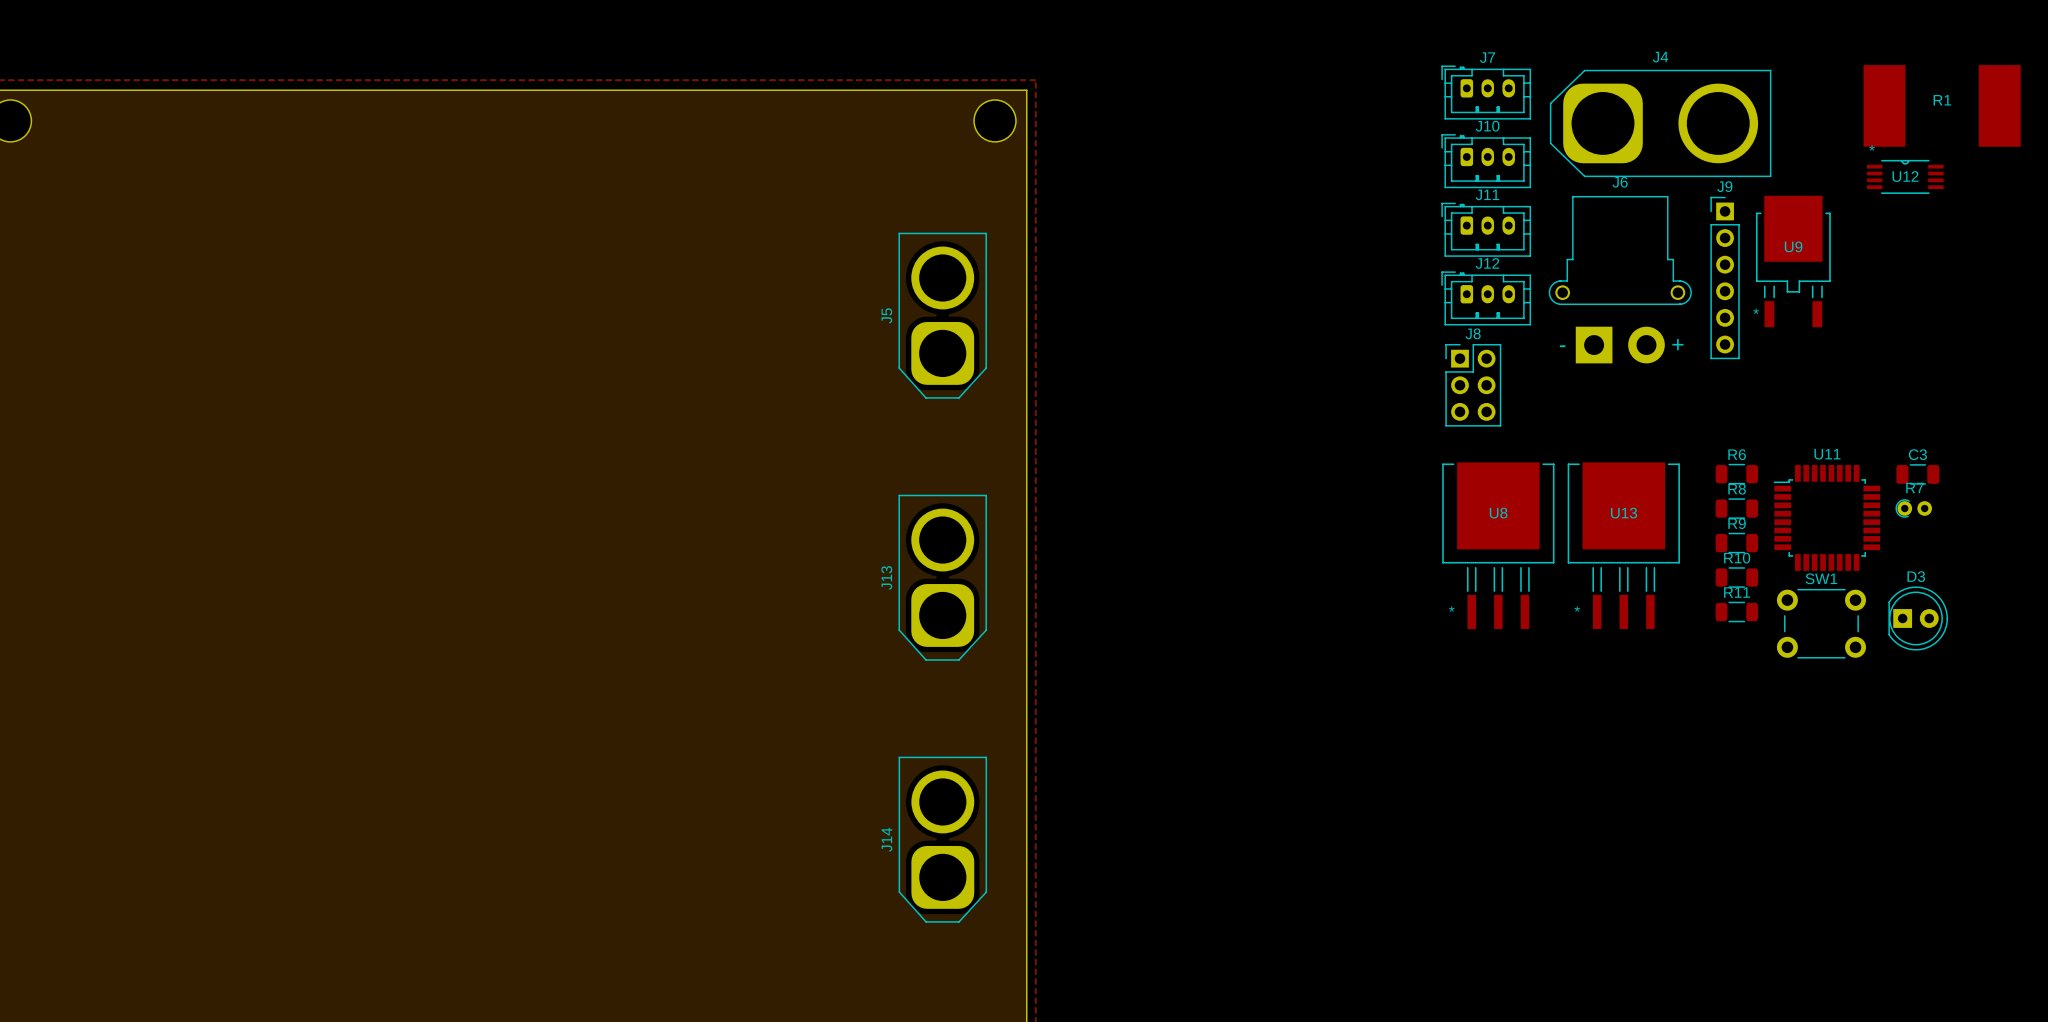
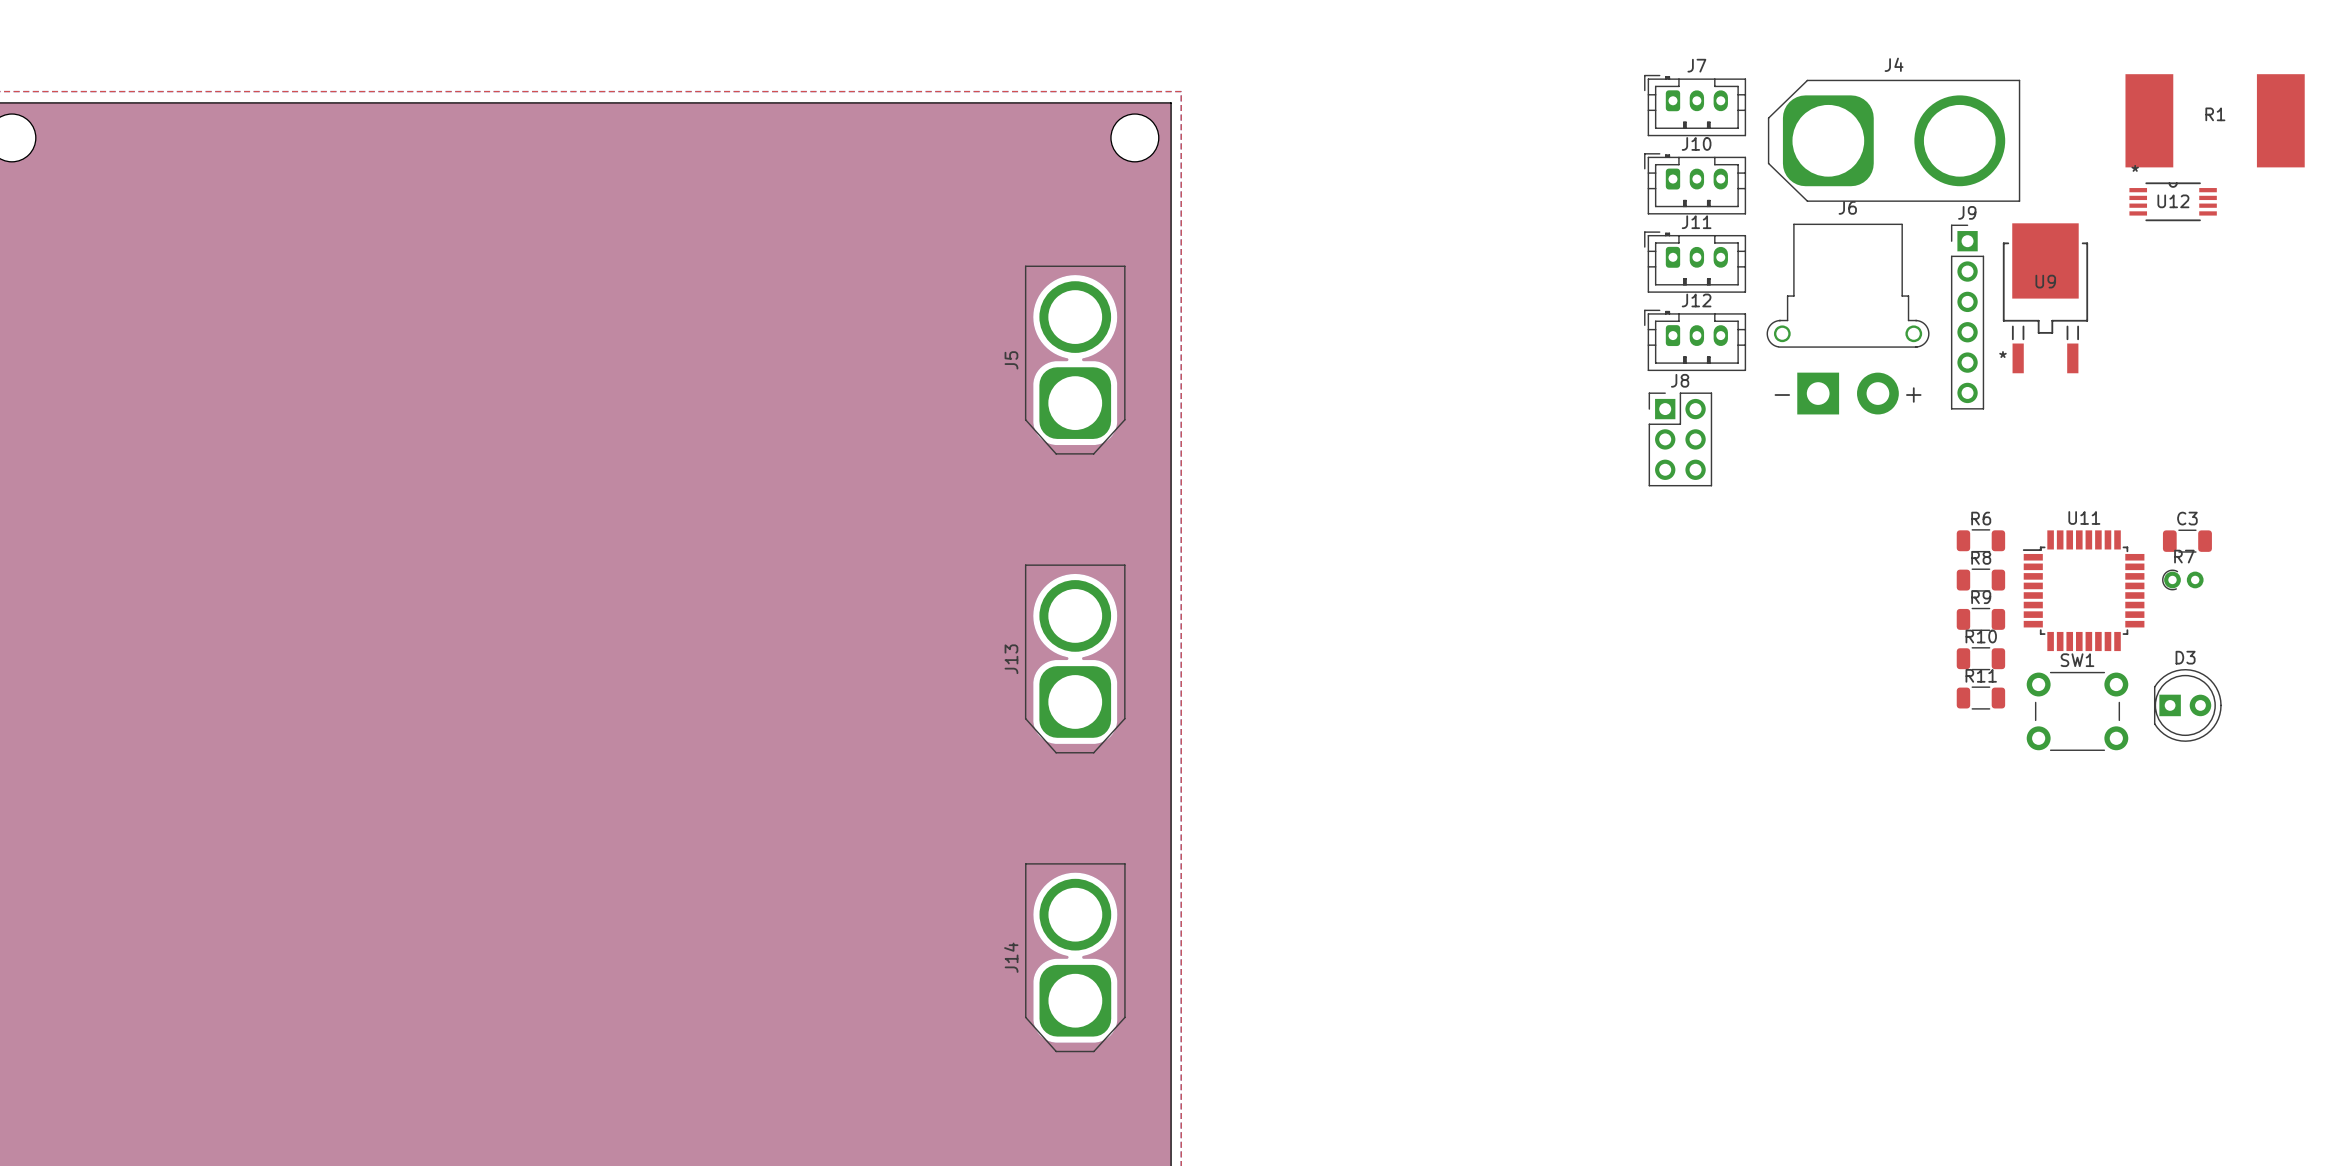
U8: (1498, 545) -> none
U13: (1623, 545) -> none

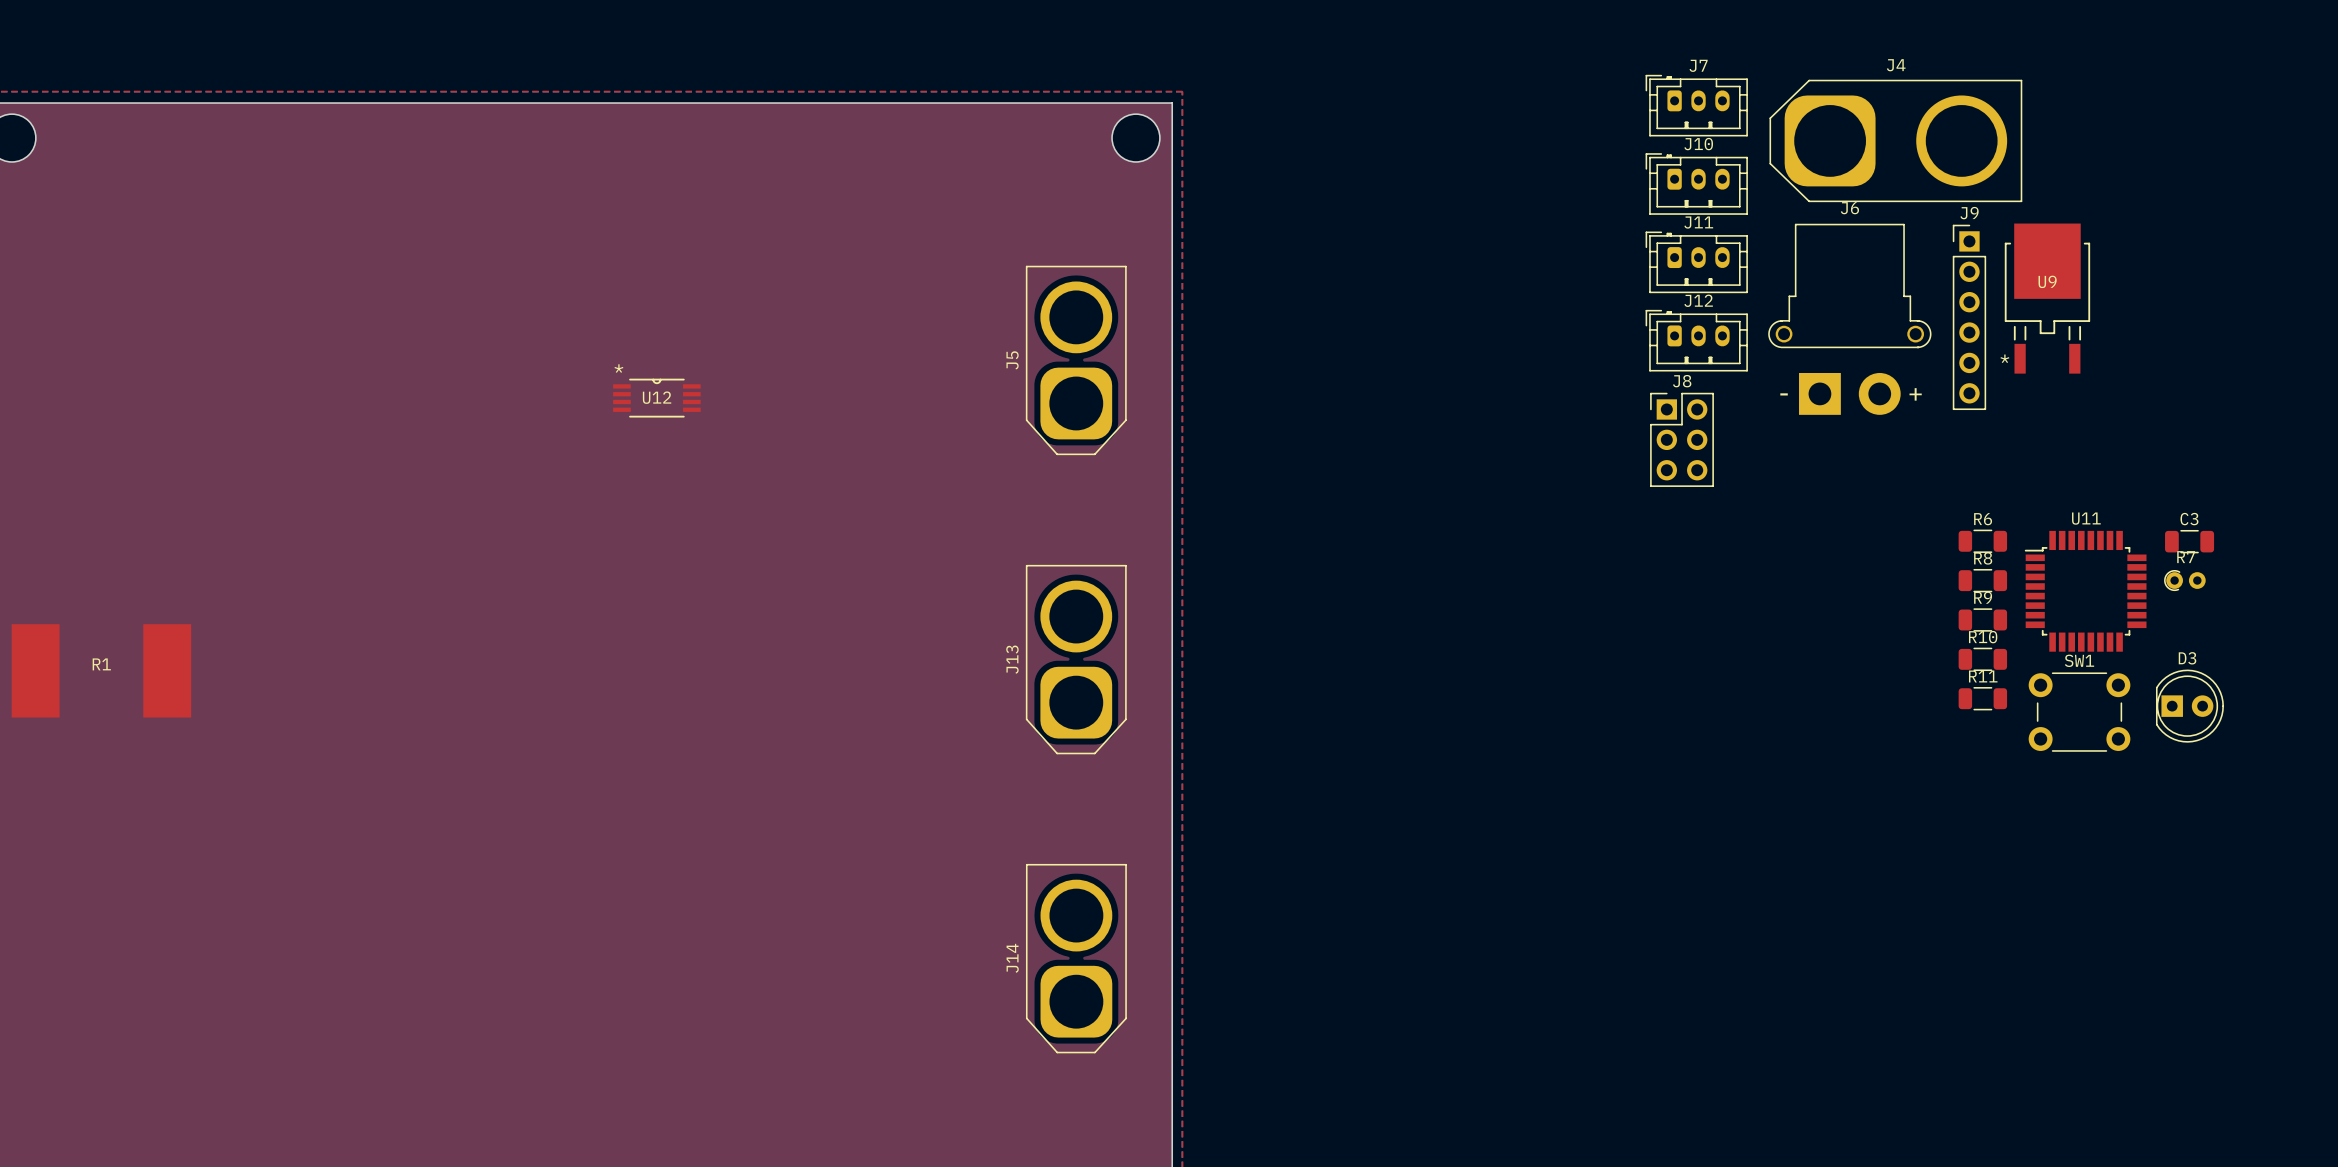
R1 position: (2215, 120) -> (101, 670)
U12 position: (2173, 201) -> (656, 398)

